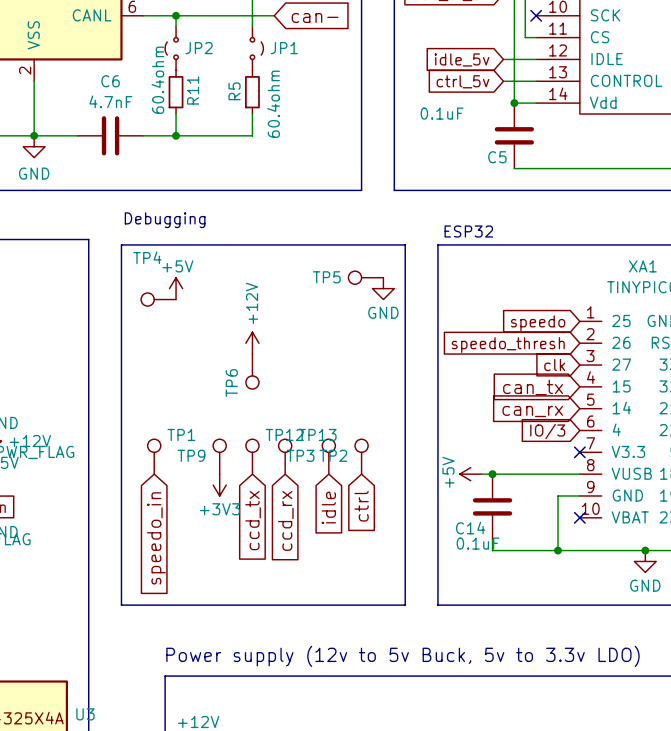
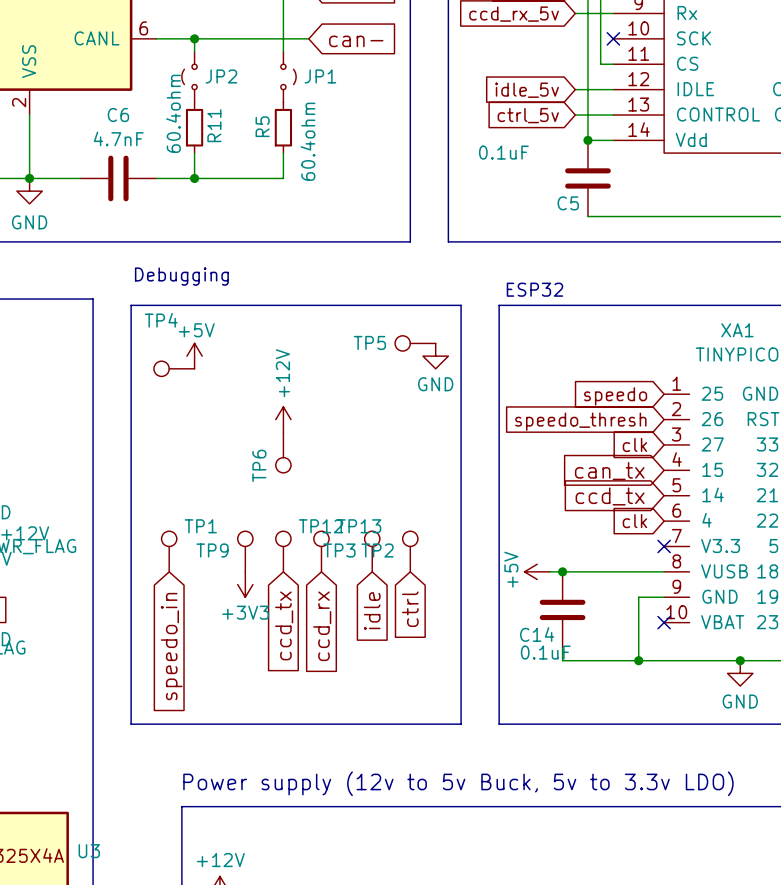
global label: can_rx (532, 411) -> ccd_tx (610, 496)
global label: IO/3 (547, 431) -> clk (634, 521)

